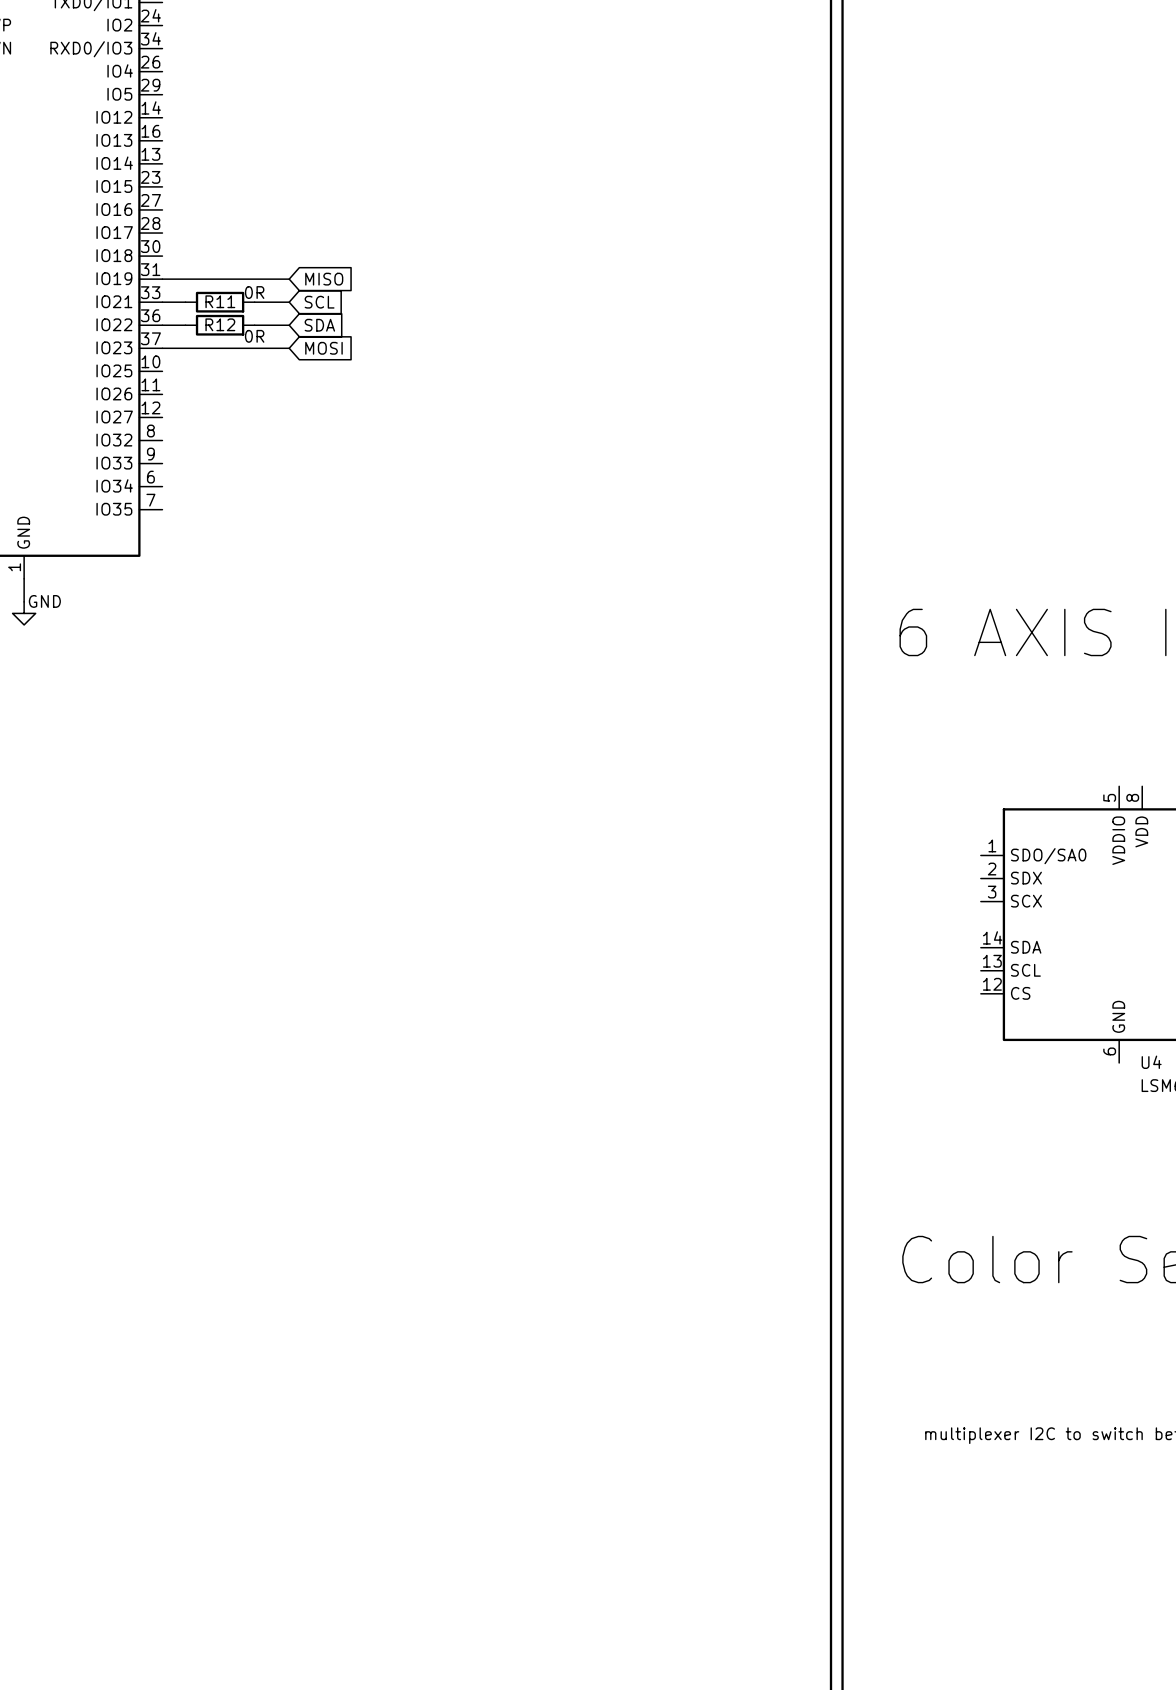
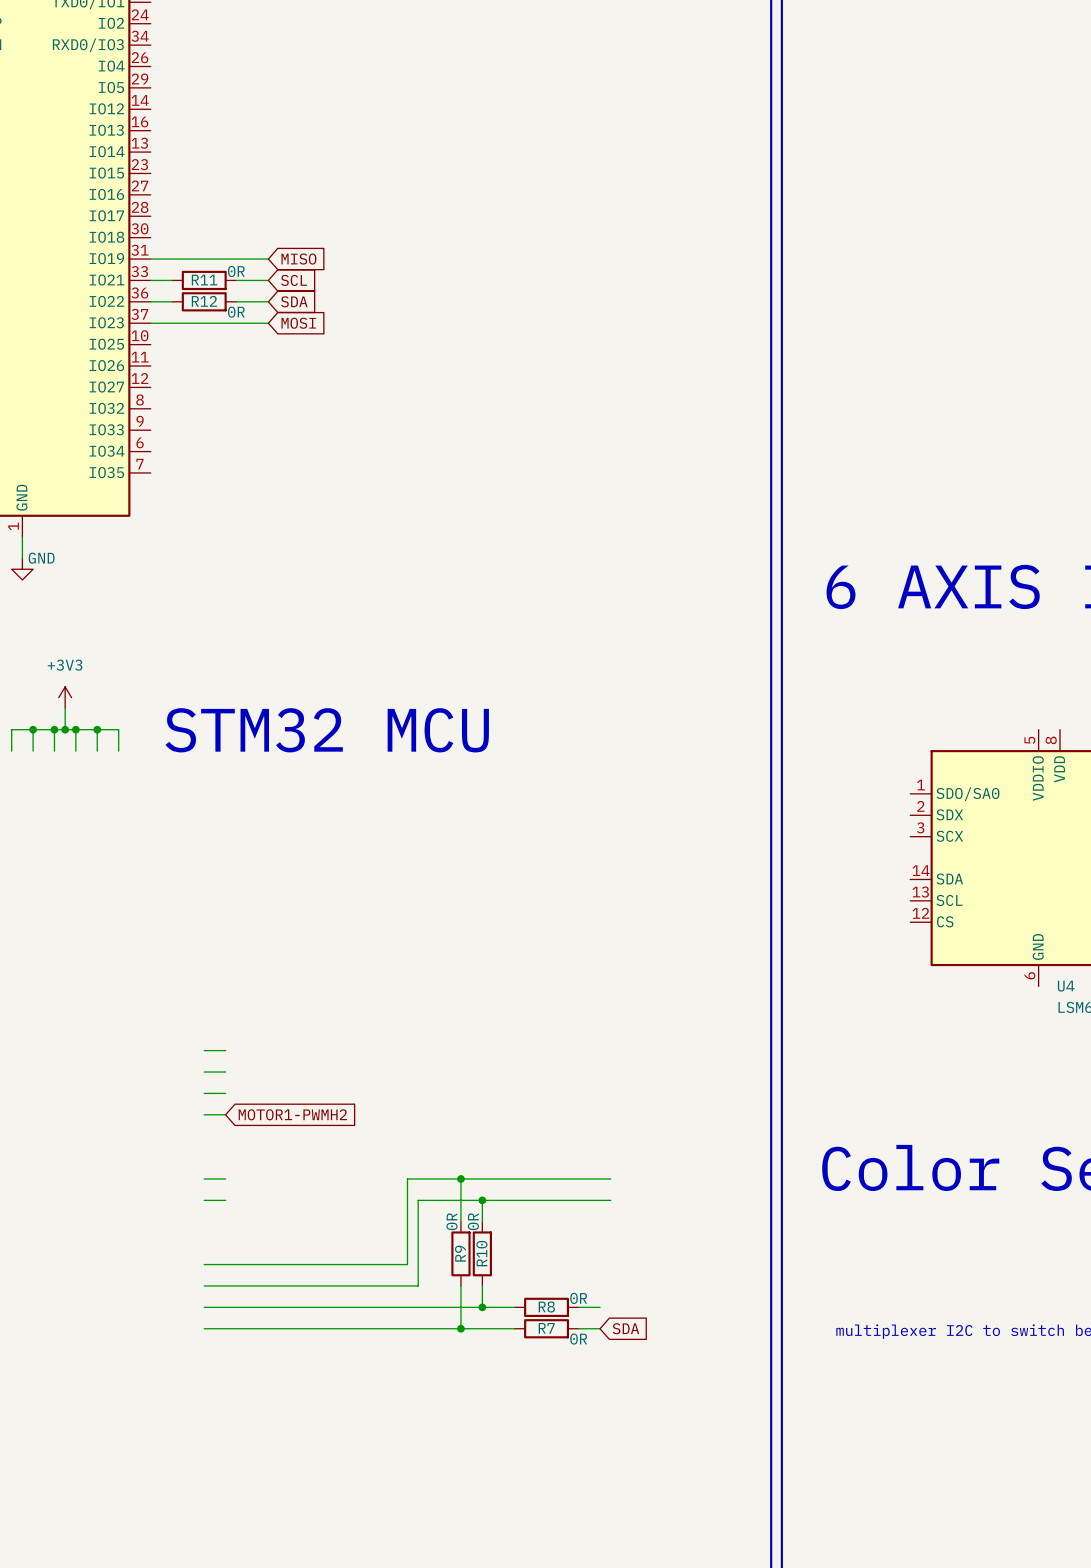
power symbol: none -> +3V3 (65, 697)
wire: none -> (65, 708) (65, 729)
wire: none -> (33, 729) (33, 751)
junction: none -> (33, 729)
wire: none -> (54, 729) (54, 751)
junction: none -> (54, 729)
junction: none -> (65, 729)
wire: none -> (75, 729) (75, 751)
junction: none -> (75, 729)
wire: none -> (97, 729) (97, 751)
junction: none -> (97, 729)
text: none -> STM32 MCU (327, 730)
wire: none -> (11, 751) (11, 729) (118, 729) (118, 751)
wire: none -> (204, 1050) (225, 1050)
wire: none -> (204, 1072) (225, 1072)
wire: none -> (204, 1093) (225, 1093)
wire: none -> (204, 1114) (225, 1114)
global label: none -> MOTOR1-PWMH2 (292, 1114)
wire: none -> (204, 1178) (225, 1178)
wire: none -> (460, 1178) (460, 1221)
junction: none -> (460, 1178)
wire: none -> (610, 1178) (407, 1178) (407, 1264) (204, 1264)
wire: none -> (204, 1200) (225, 1200)
wire: none -> (482, 1200) (482, 1221)
junction: none -> (482, 1200)
wire: none -> (610, 1200) (418, 1200) (418, 1285) (204, 1285)
R9: none -> 0R (460, 1253)
R10: none -> 0R (482, 1253)
wire: none -> (460, 1285) (460, 1328)
wire: none -> (482, 1285) (482, 1307)
wire: none -> (204, 1307) (514, 1307)
junction: none -> (482, 1307)
R8: none -> 0R (546, 1307)
wire: none -> (578, 1307) (600, 1307)
wire: none -> (204, 1328) (514, 1328)
junction: none -> (460, 1328)
R7: none -> 0R (546, 1328)
wire: none -> (578, 1328) (600, 1328)
global label: none -> SDA (625, 1328)

